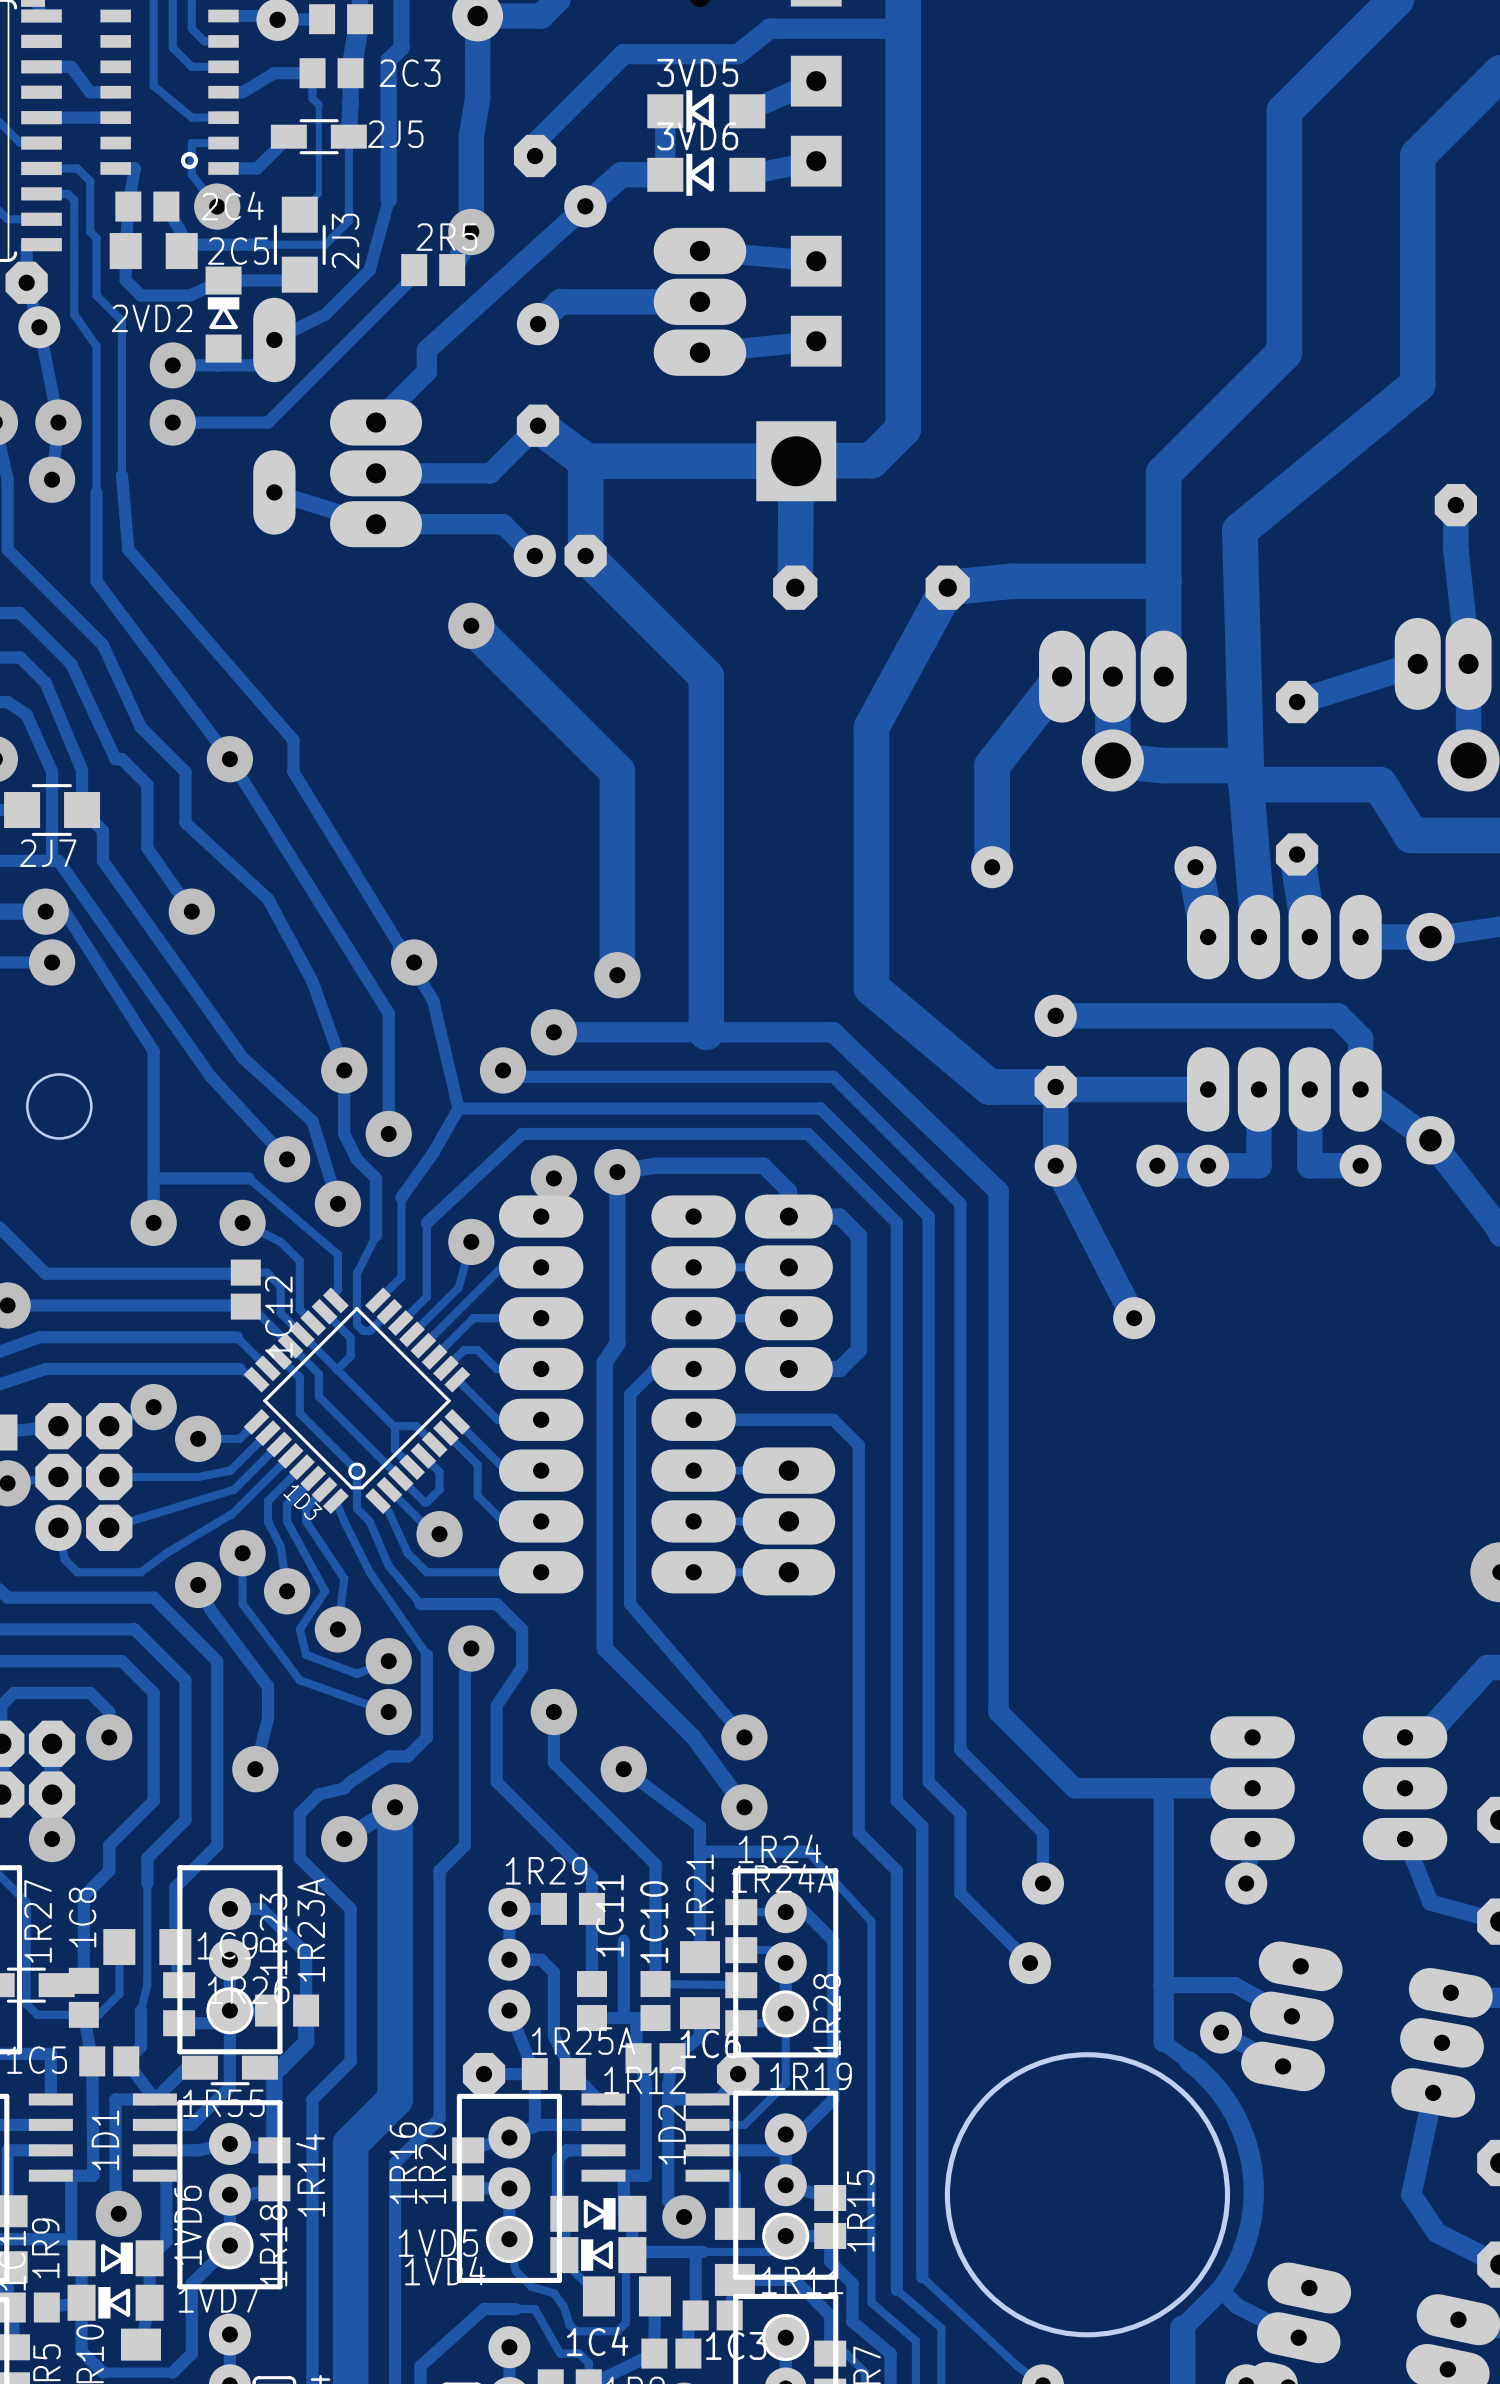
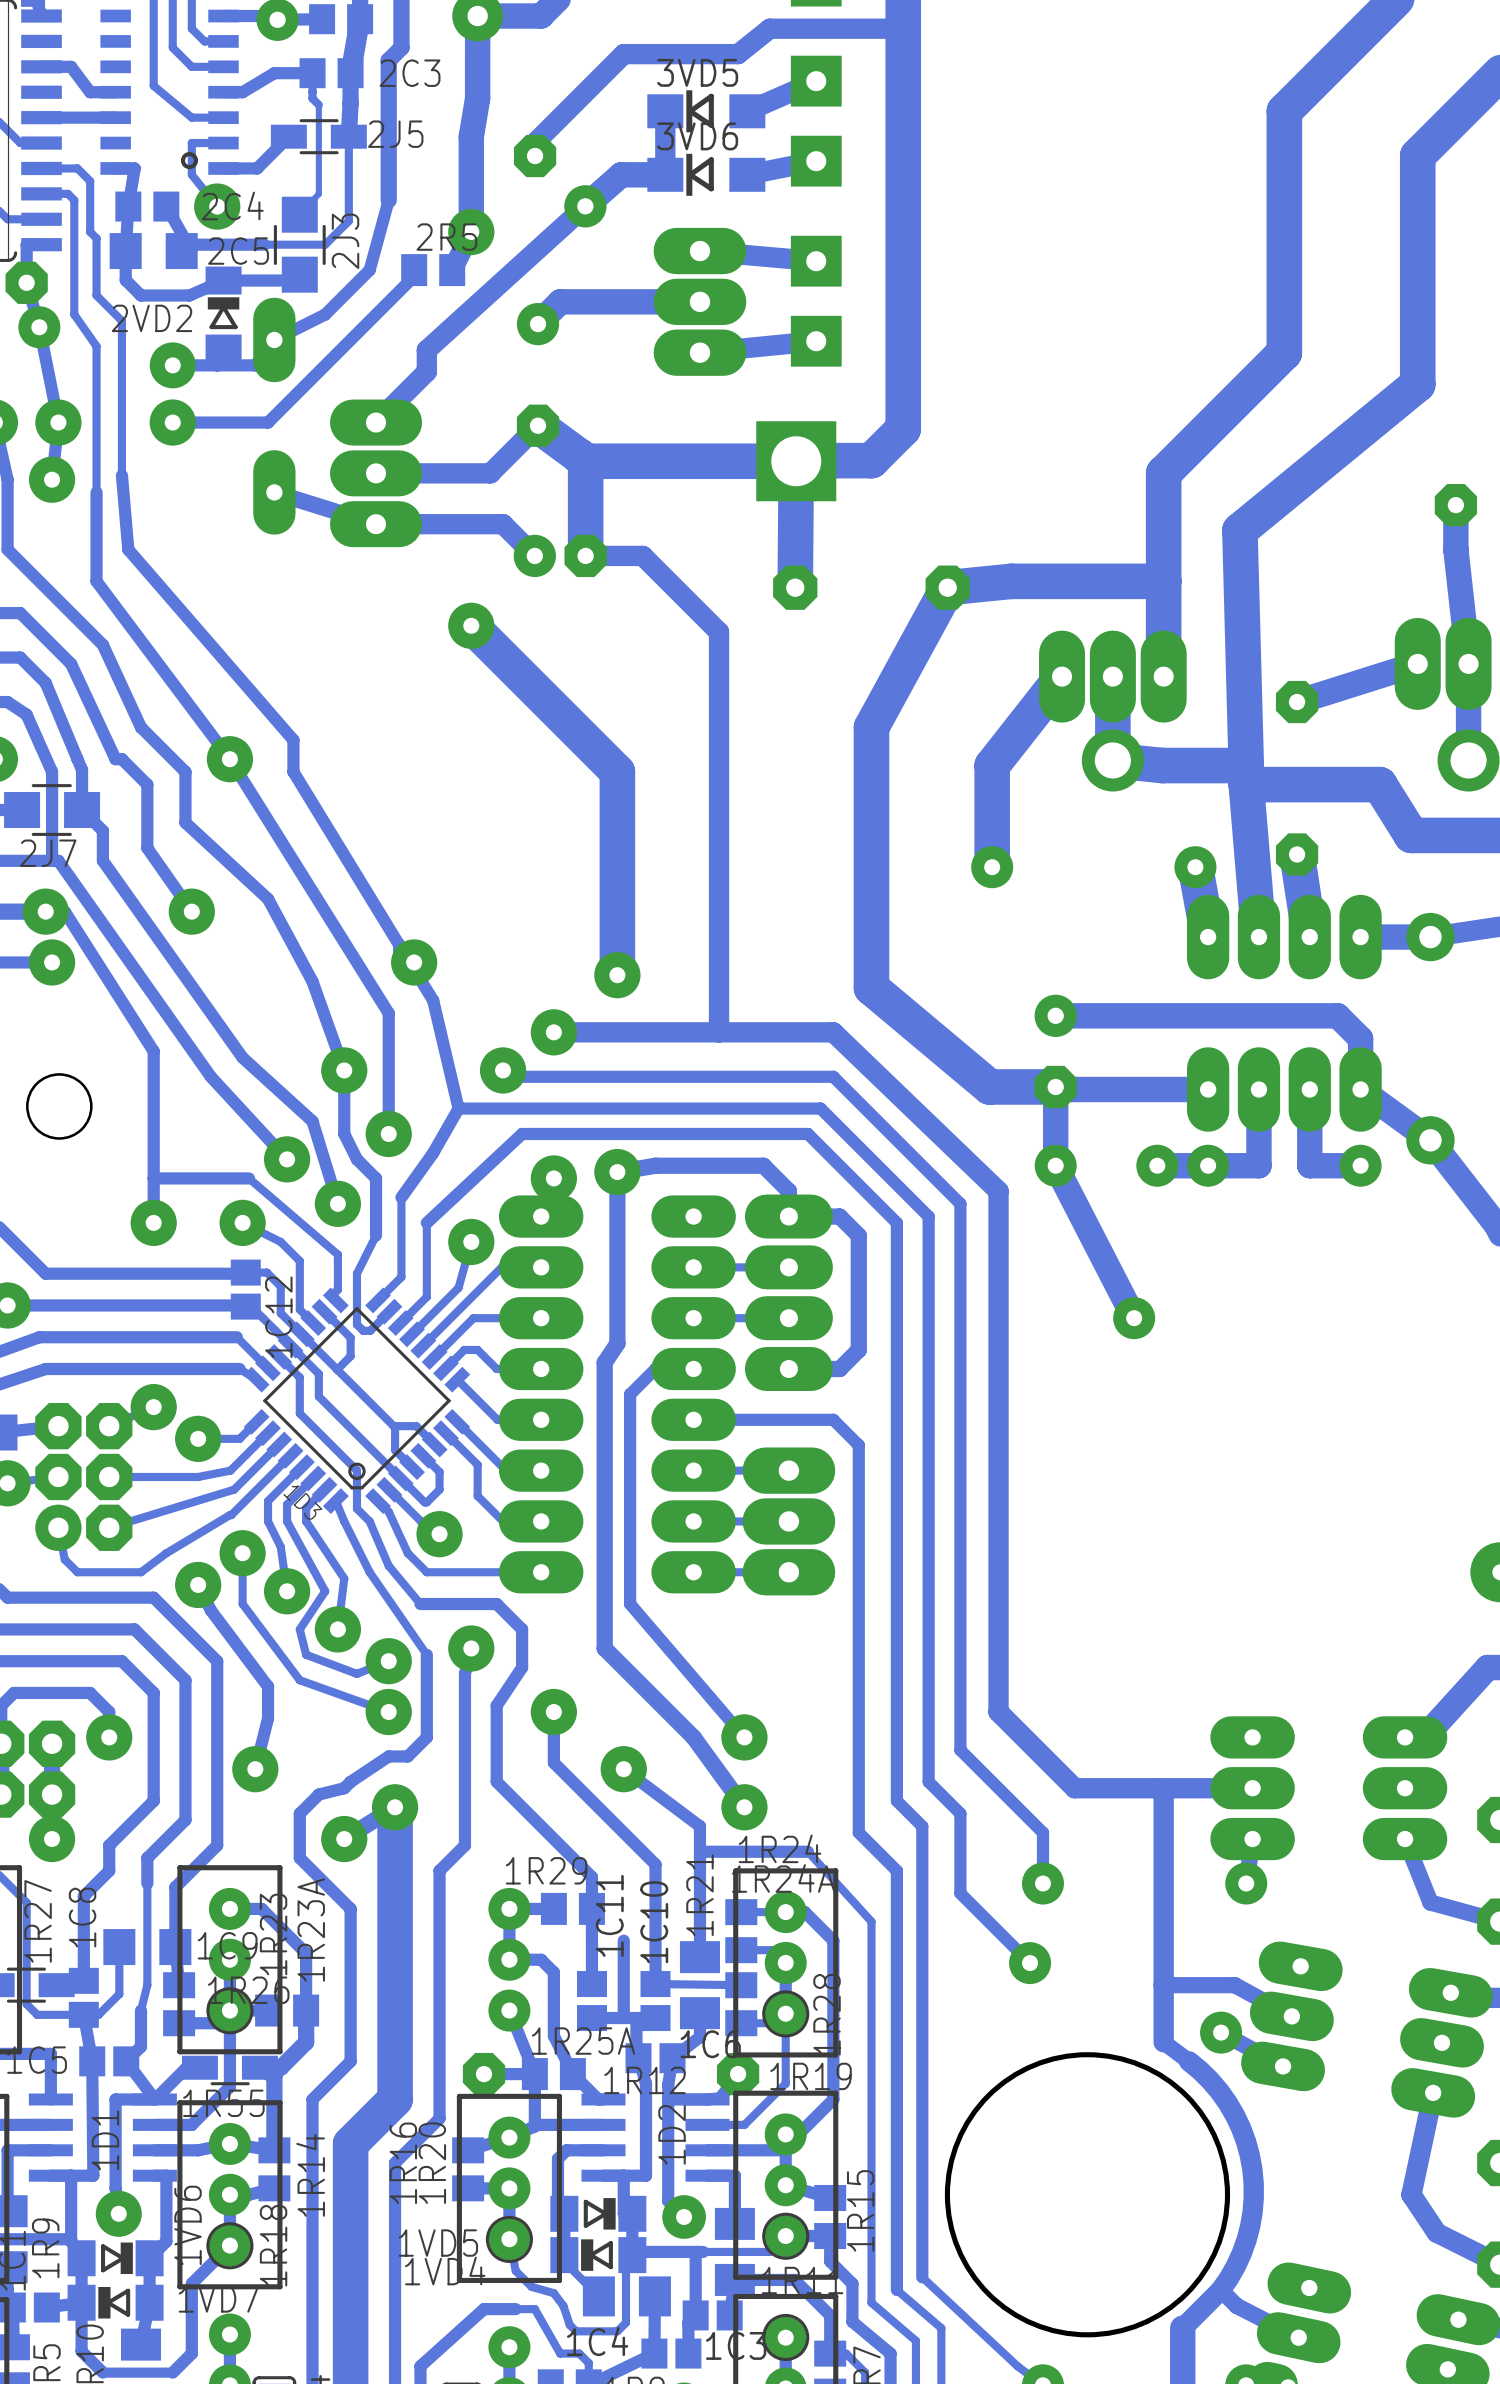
track: (585, 555) (706, 676) (706, 1032) -> (585, 555) (642, 555) (719, 632) (719, 1032)

